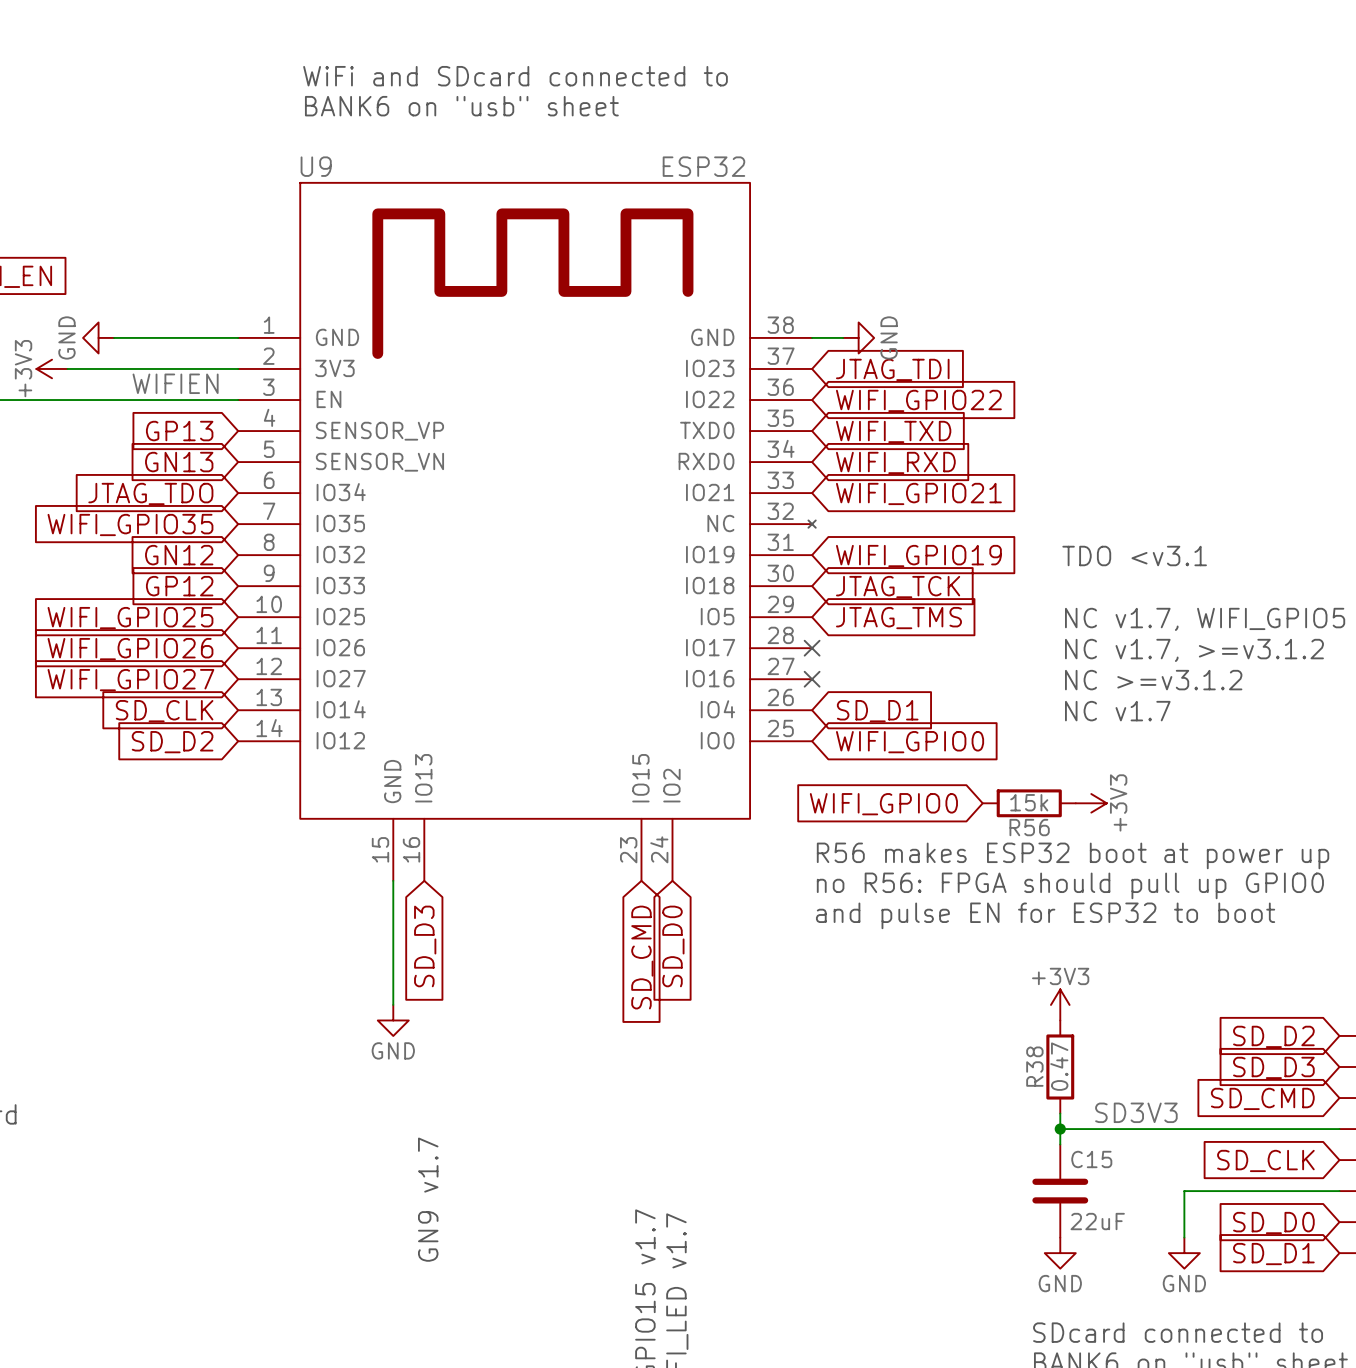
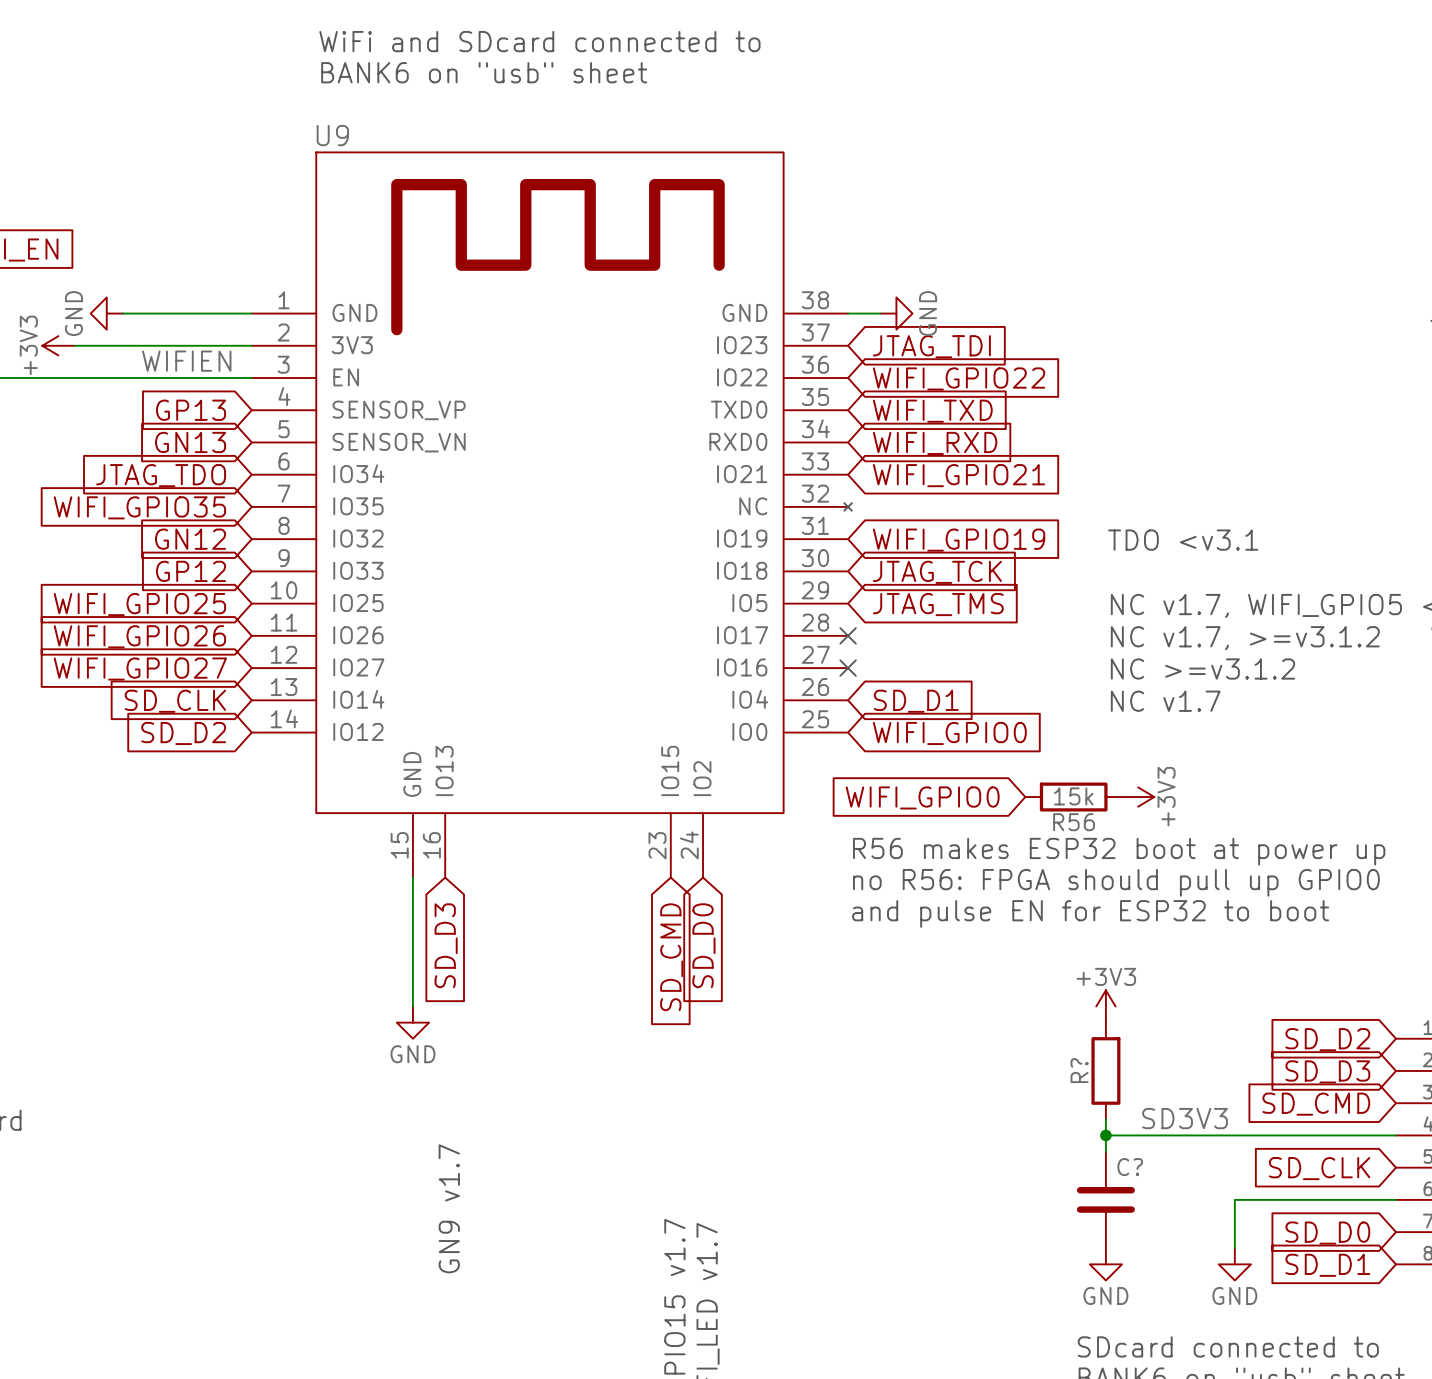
U9 value: ESP32 (703, 166) -> none
R38 name: R38 (1034, 1066) -> R? (1079, 1070)
R38 value: 0.47 (1059, 1066) -> none
C15 name: C15 (1091, 1159) -> C? (1130, 1167)
C15 value: 22uF (1097, 1221) -> none

